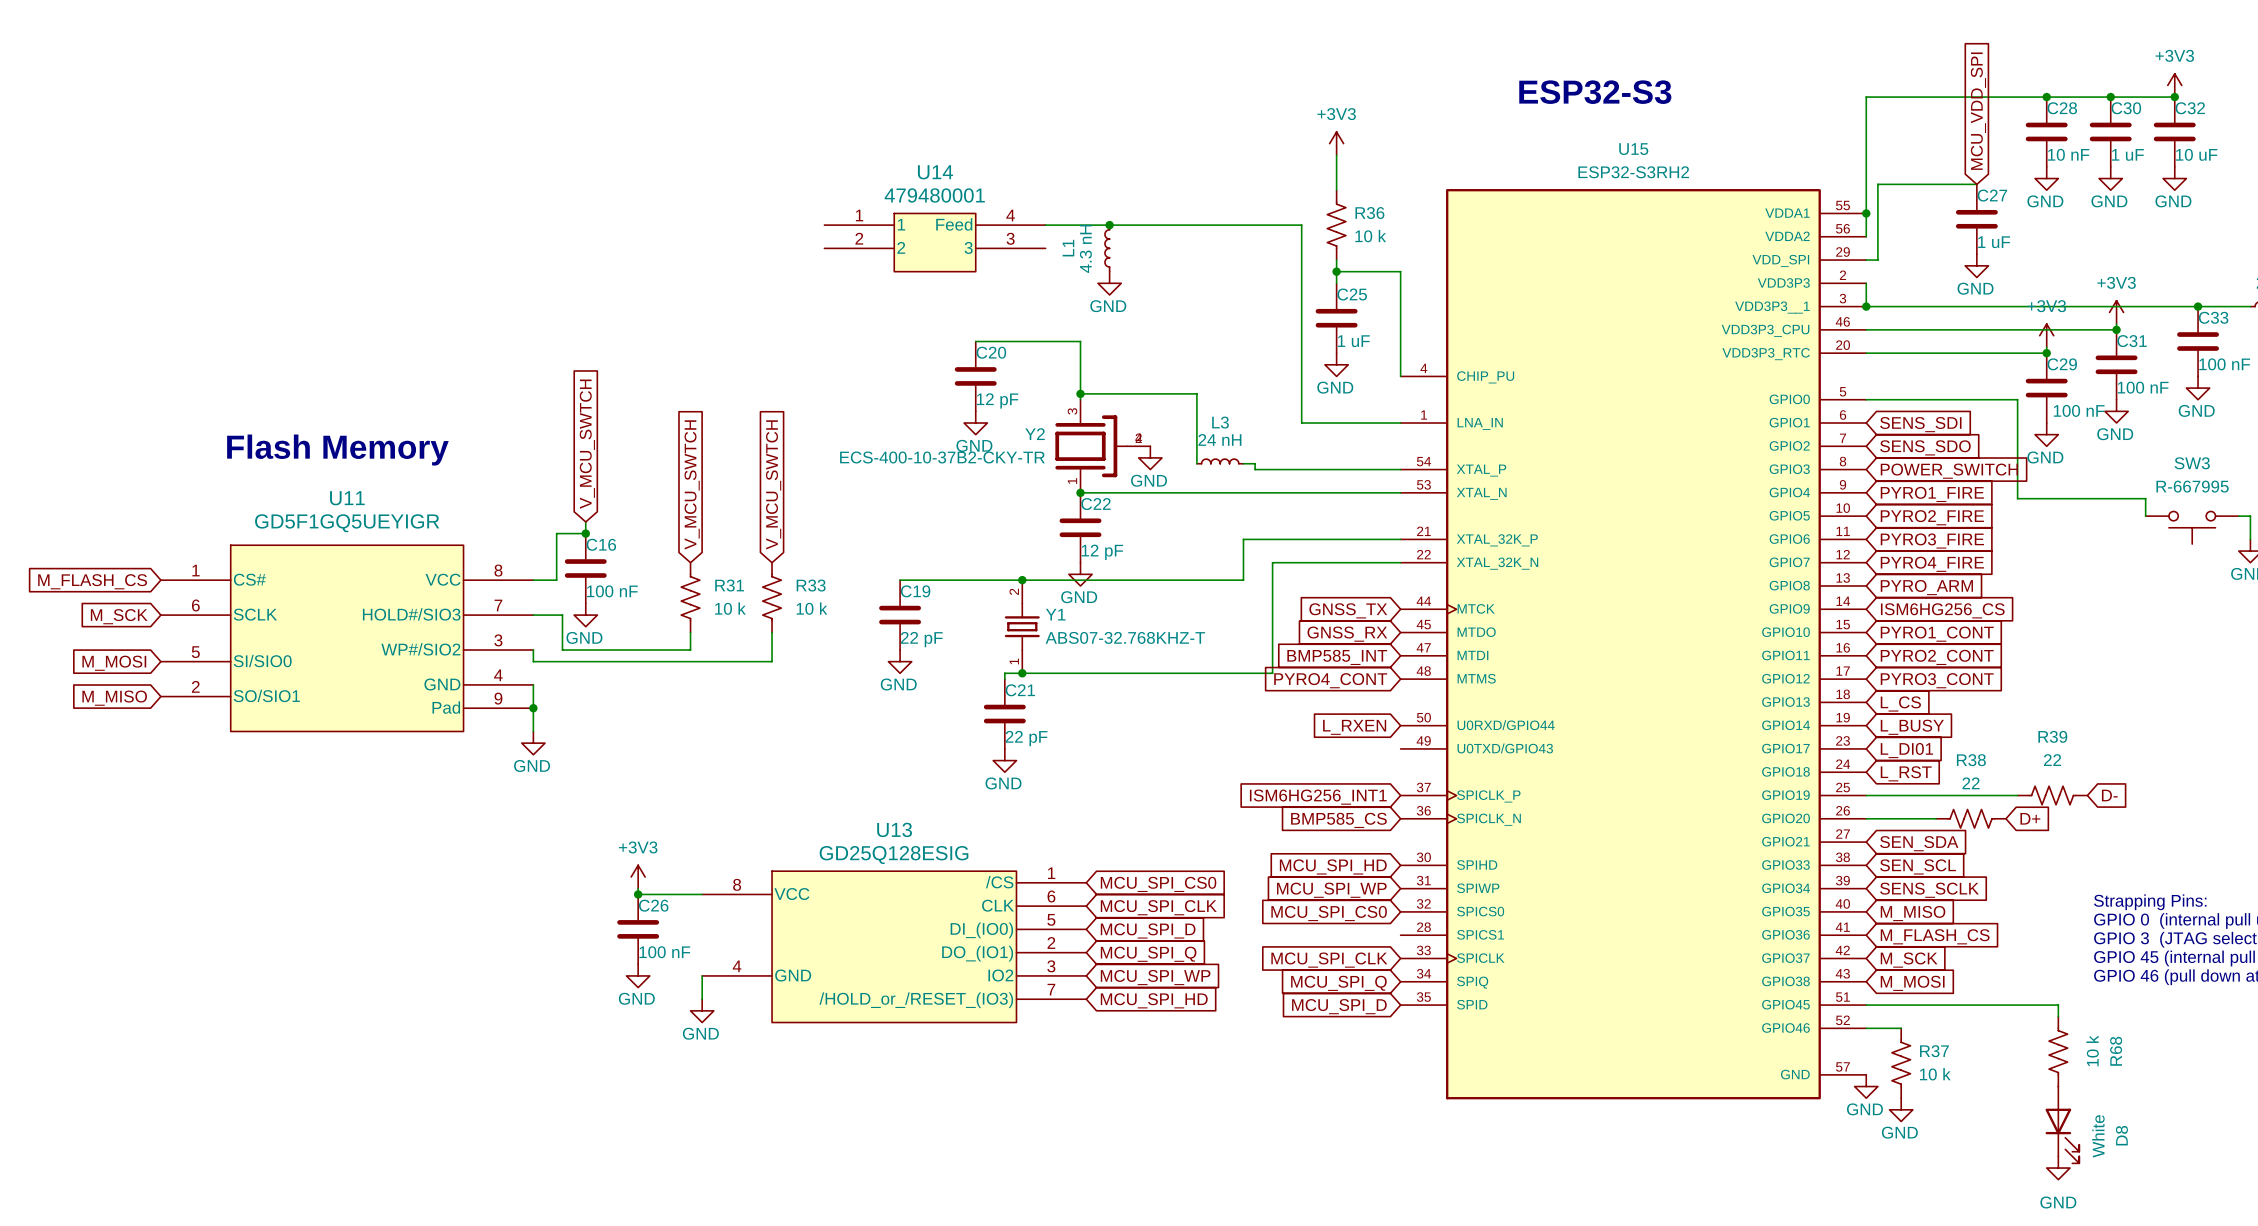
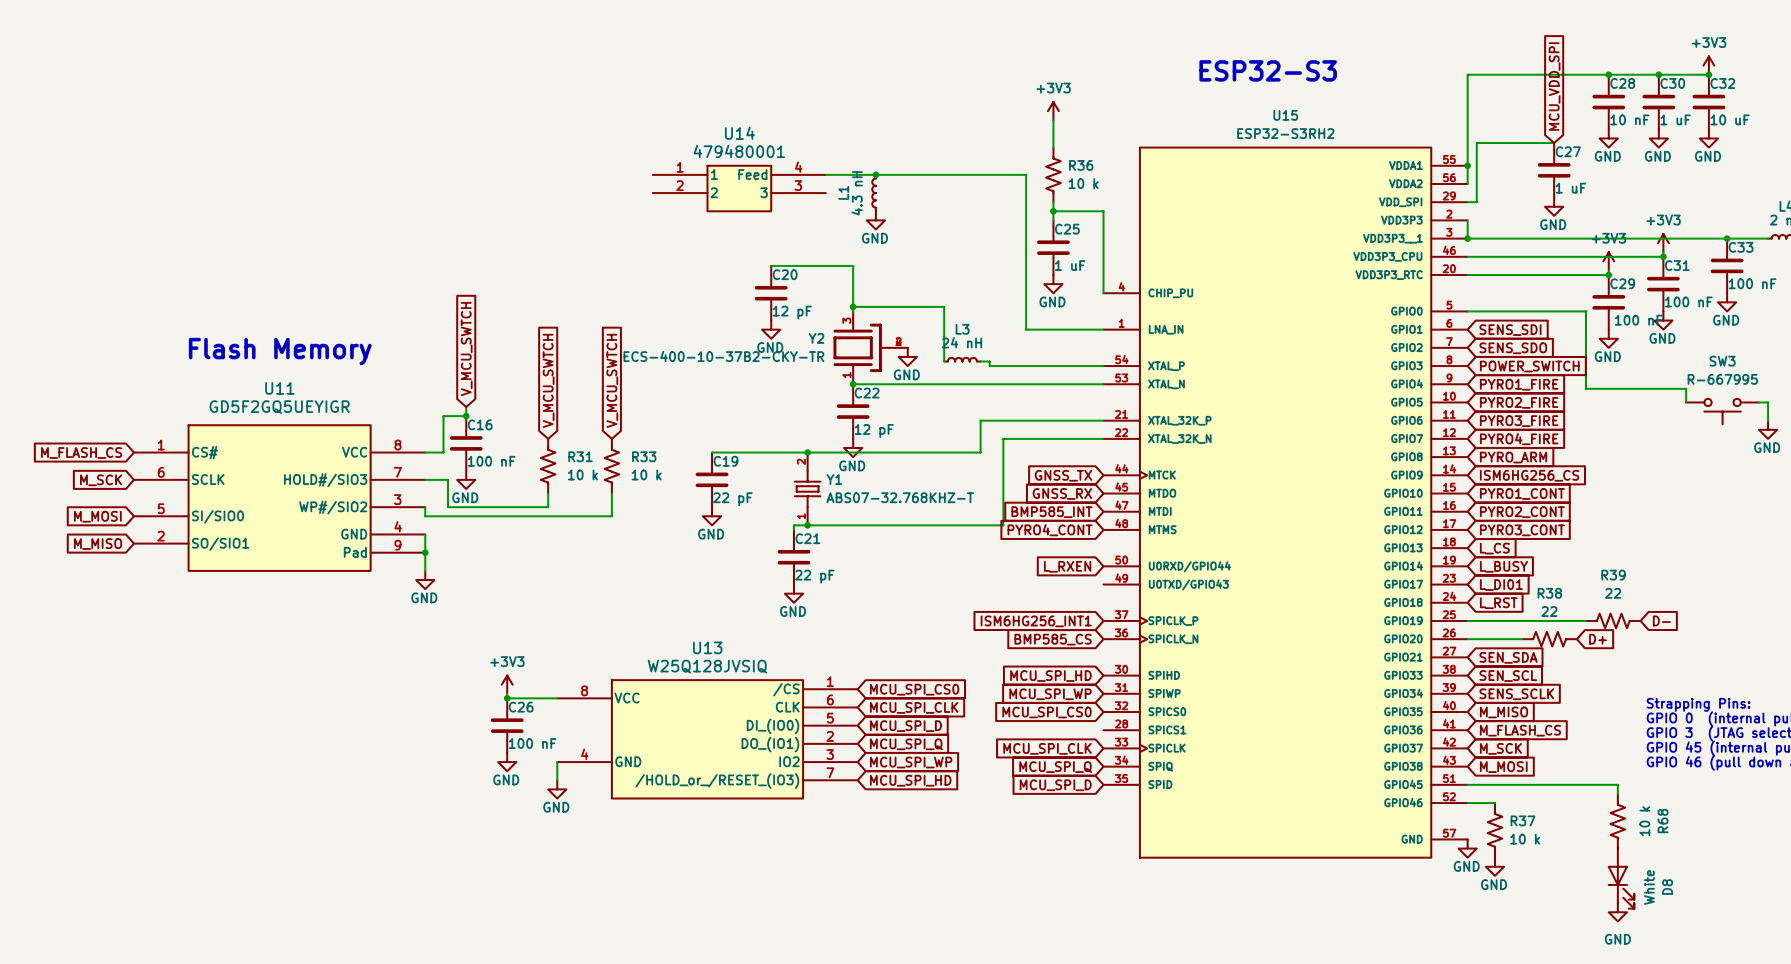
U11 value: GD5F1GQ5UEYIGR (347, 523) -> GD5F2GQ5UEYIGR (279, 407)
U13 value: GD25Q128ESIG (894, 855) -> W25Q128JVSIQ (707, 666)

